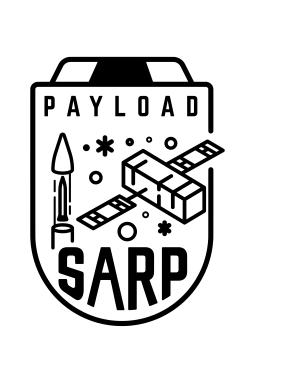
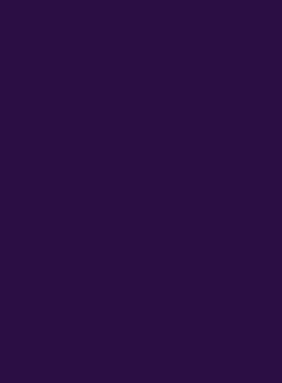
drawing: [30, 56, 225, 327] -> none

